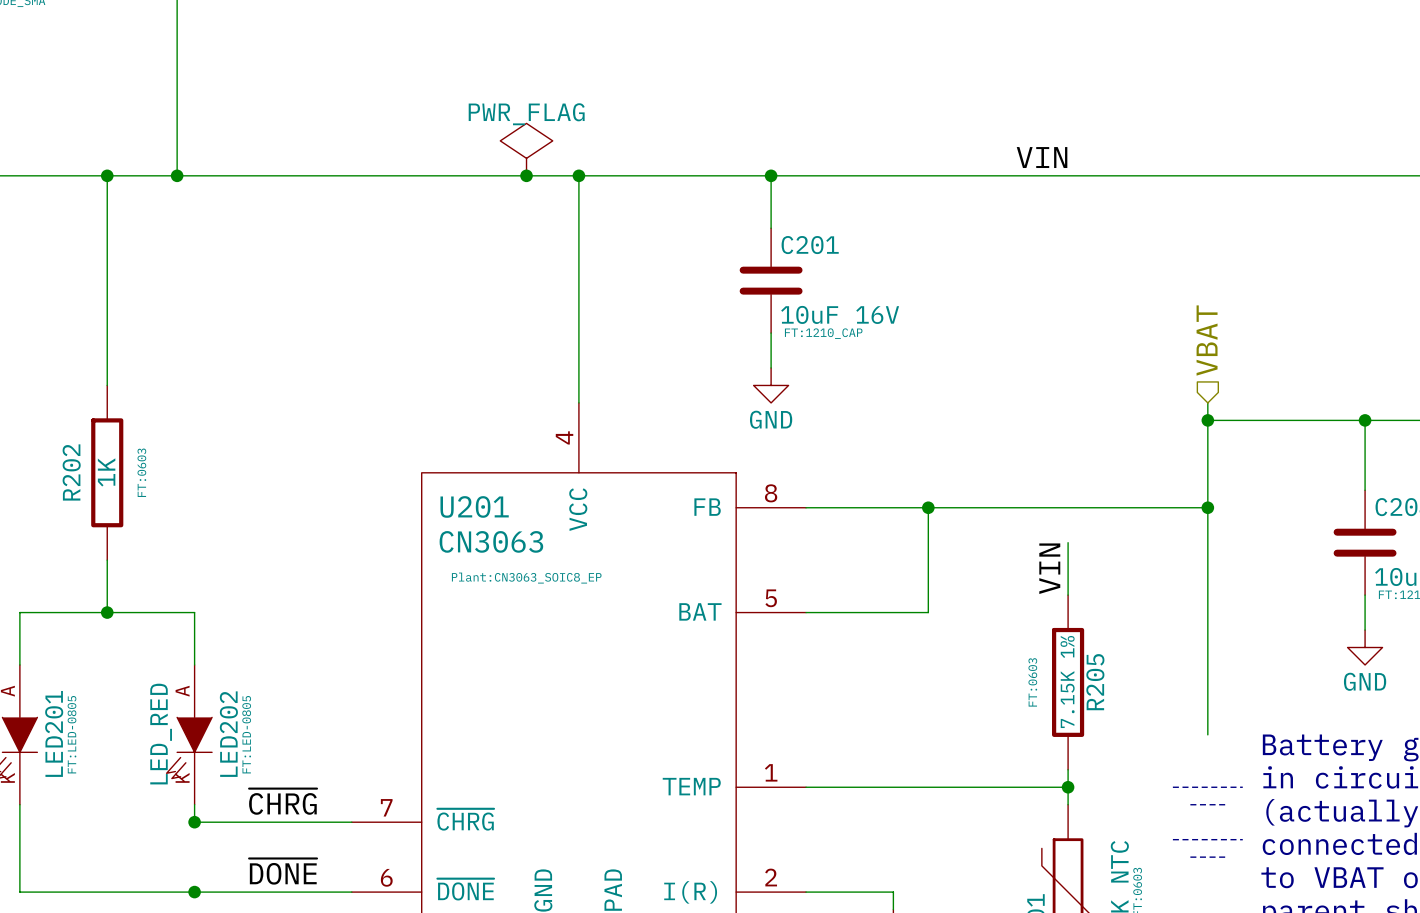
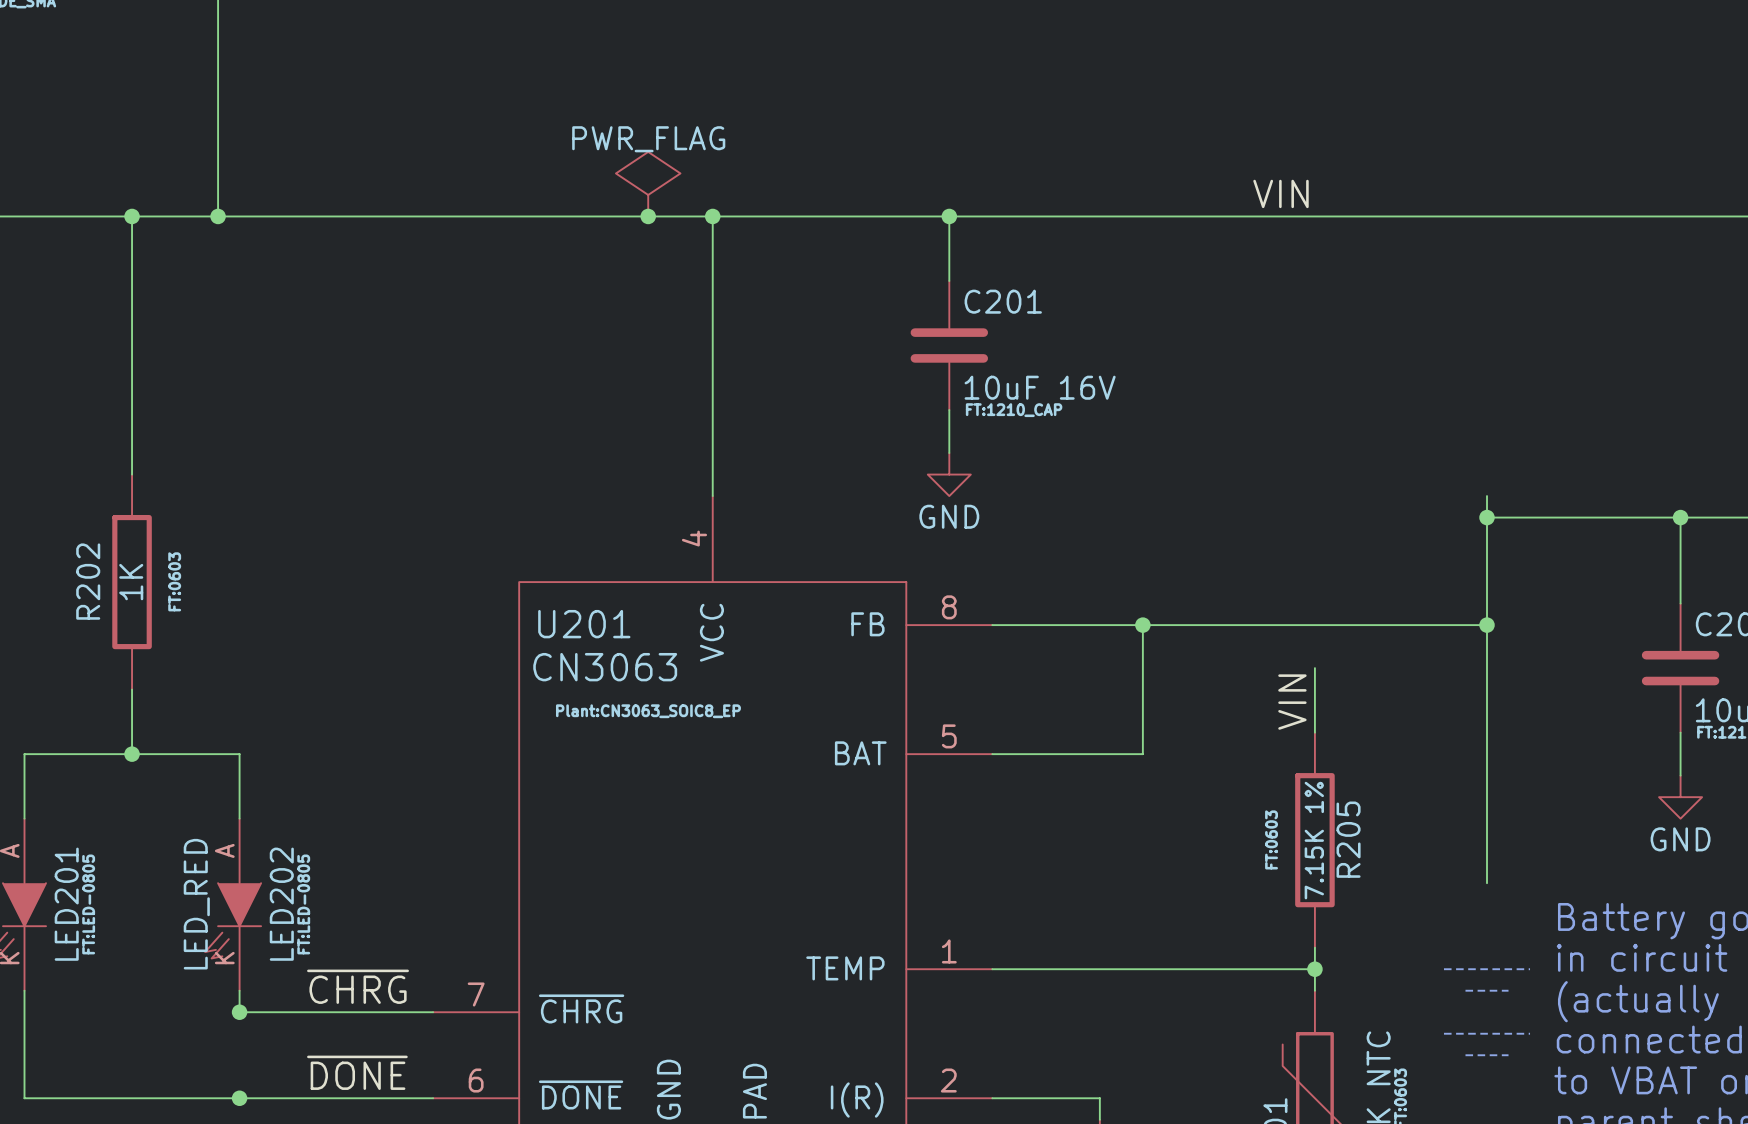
hierarchical label: VBAT (1207, 340) -> none
wire: (1207, 717) (1207, 734) -> none

